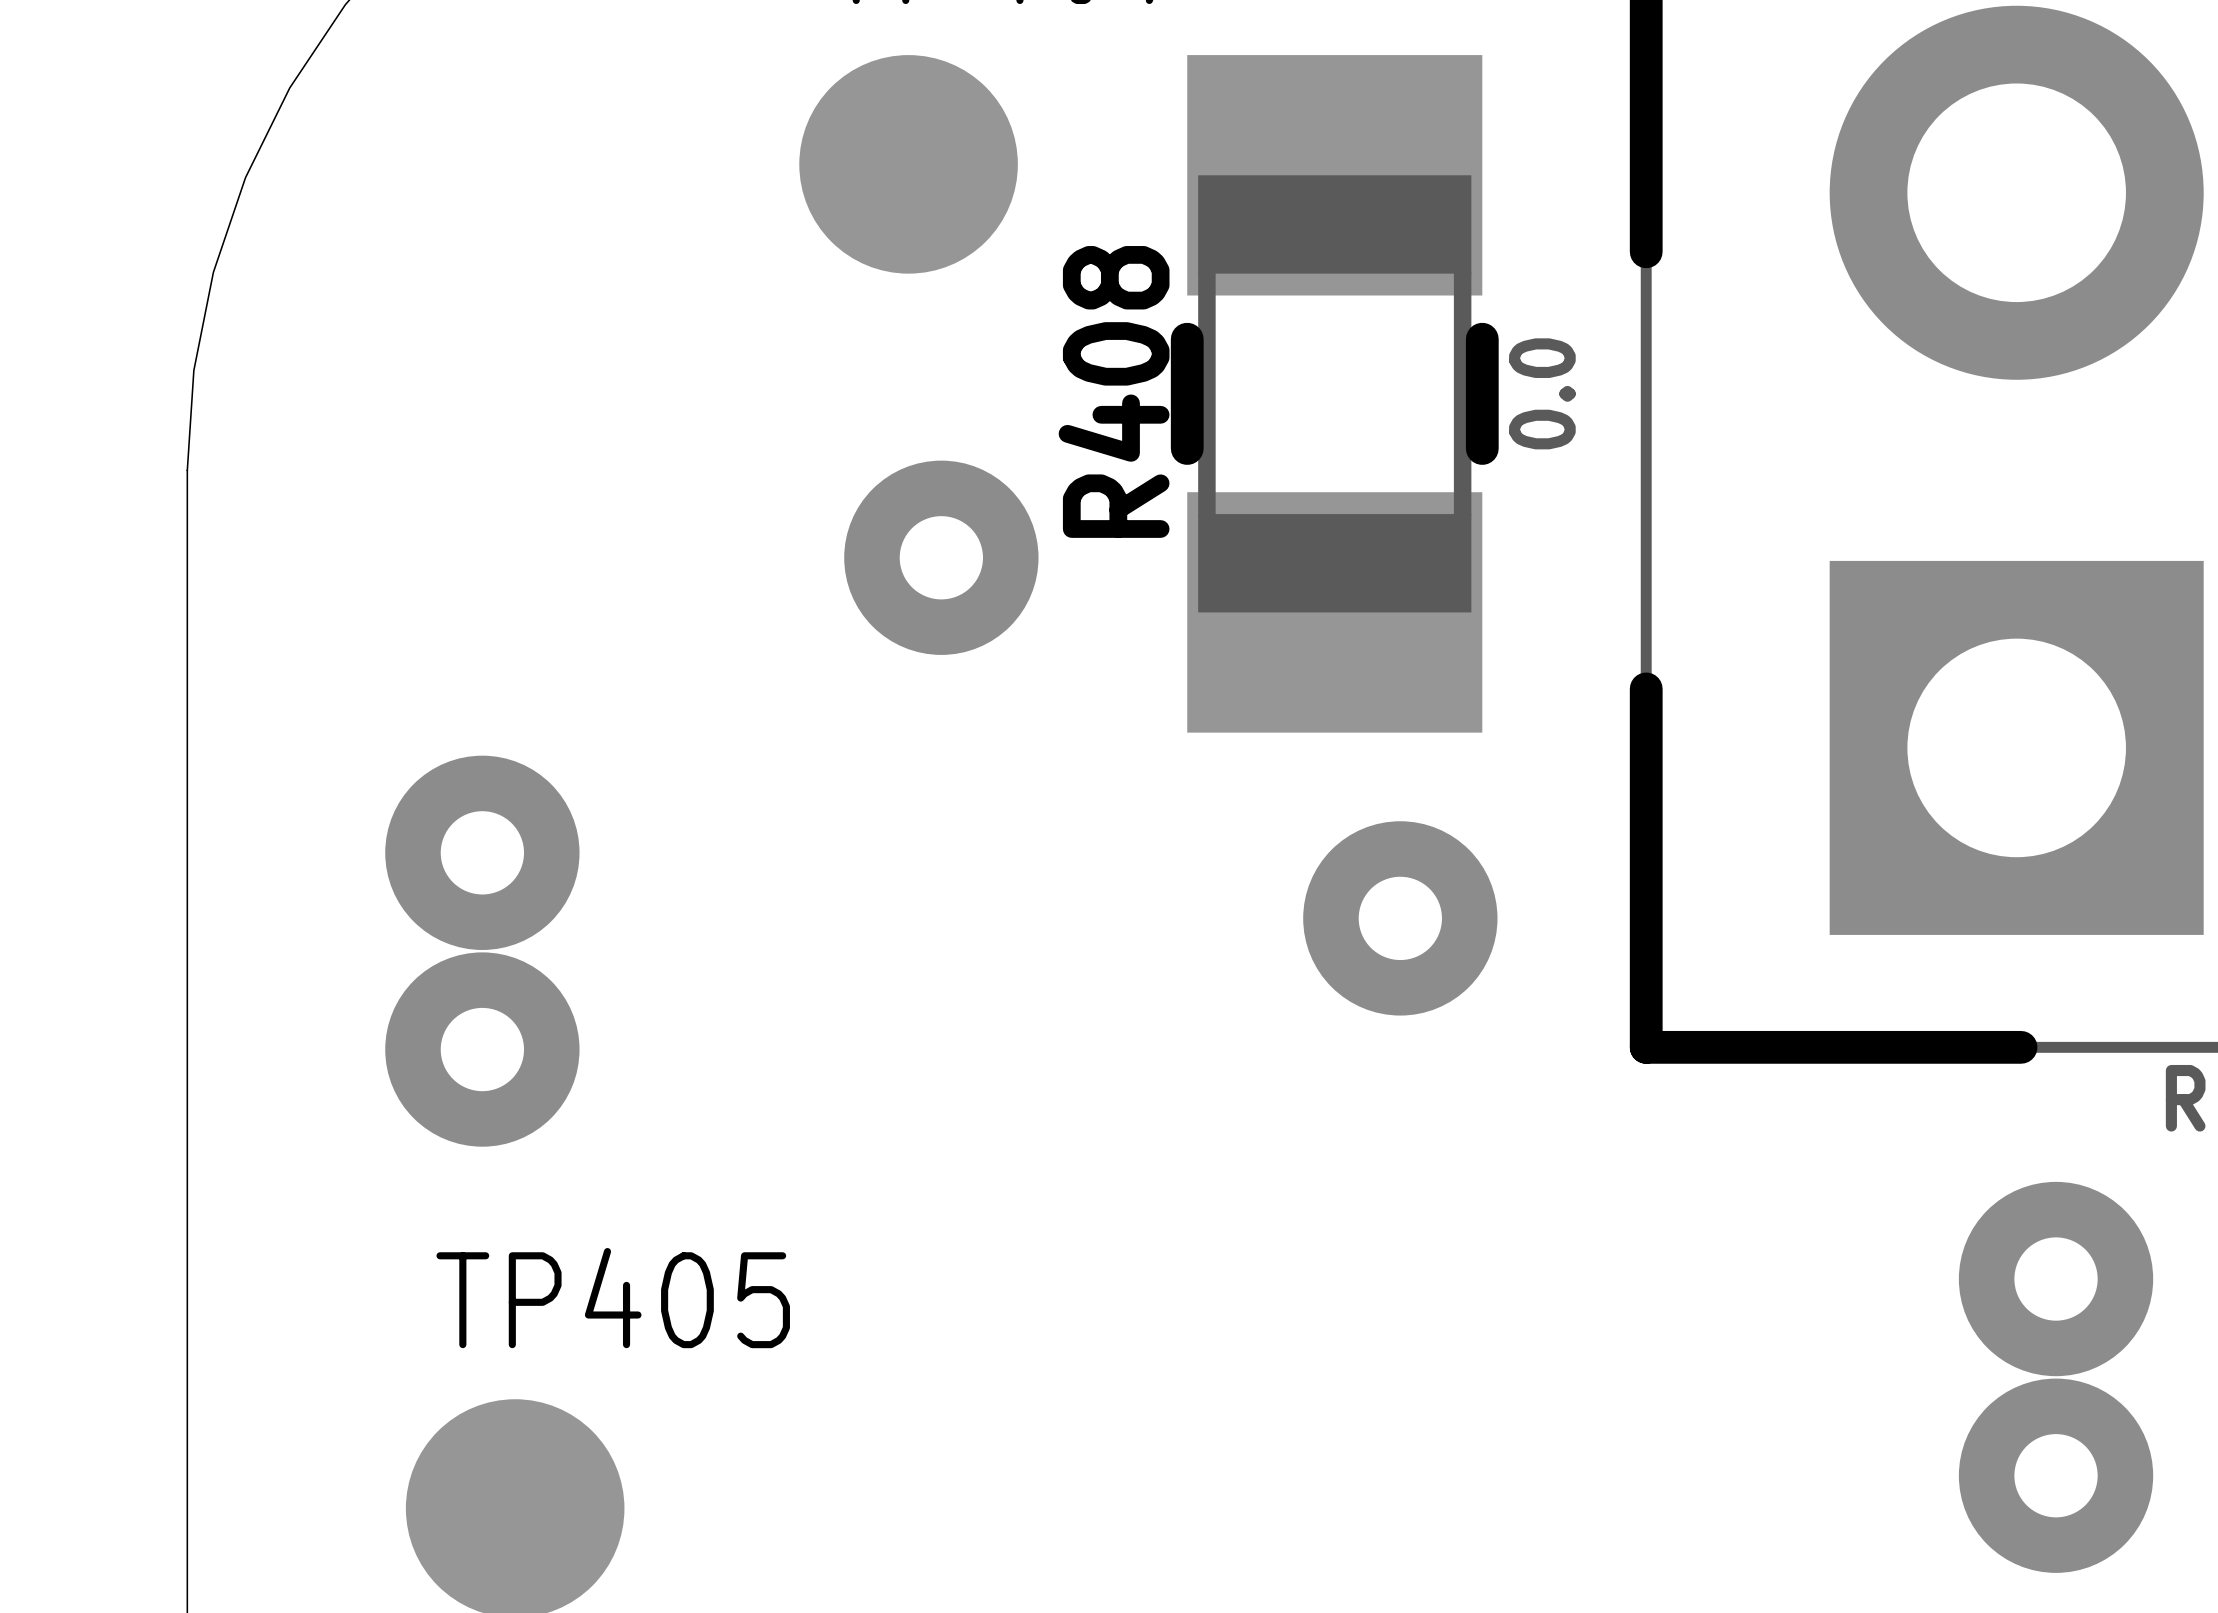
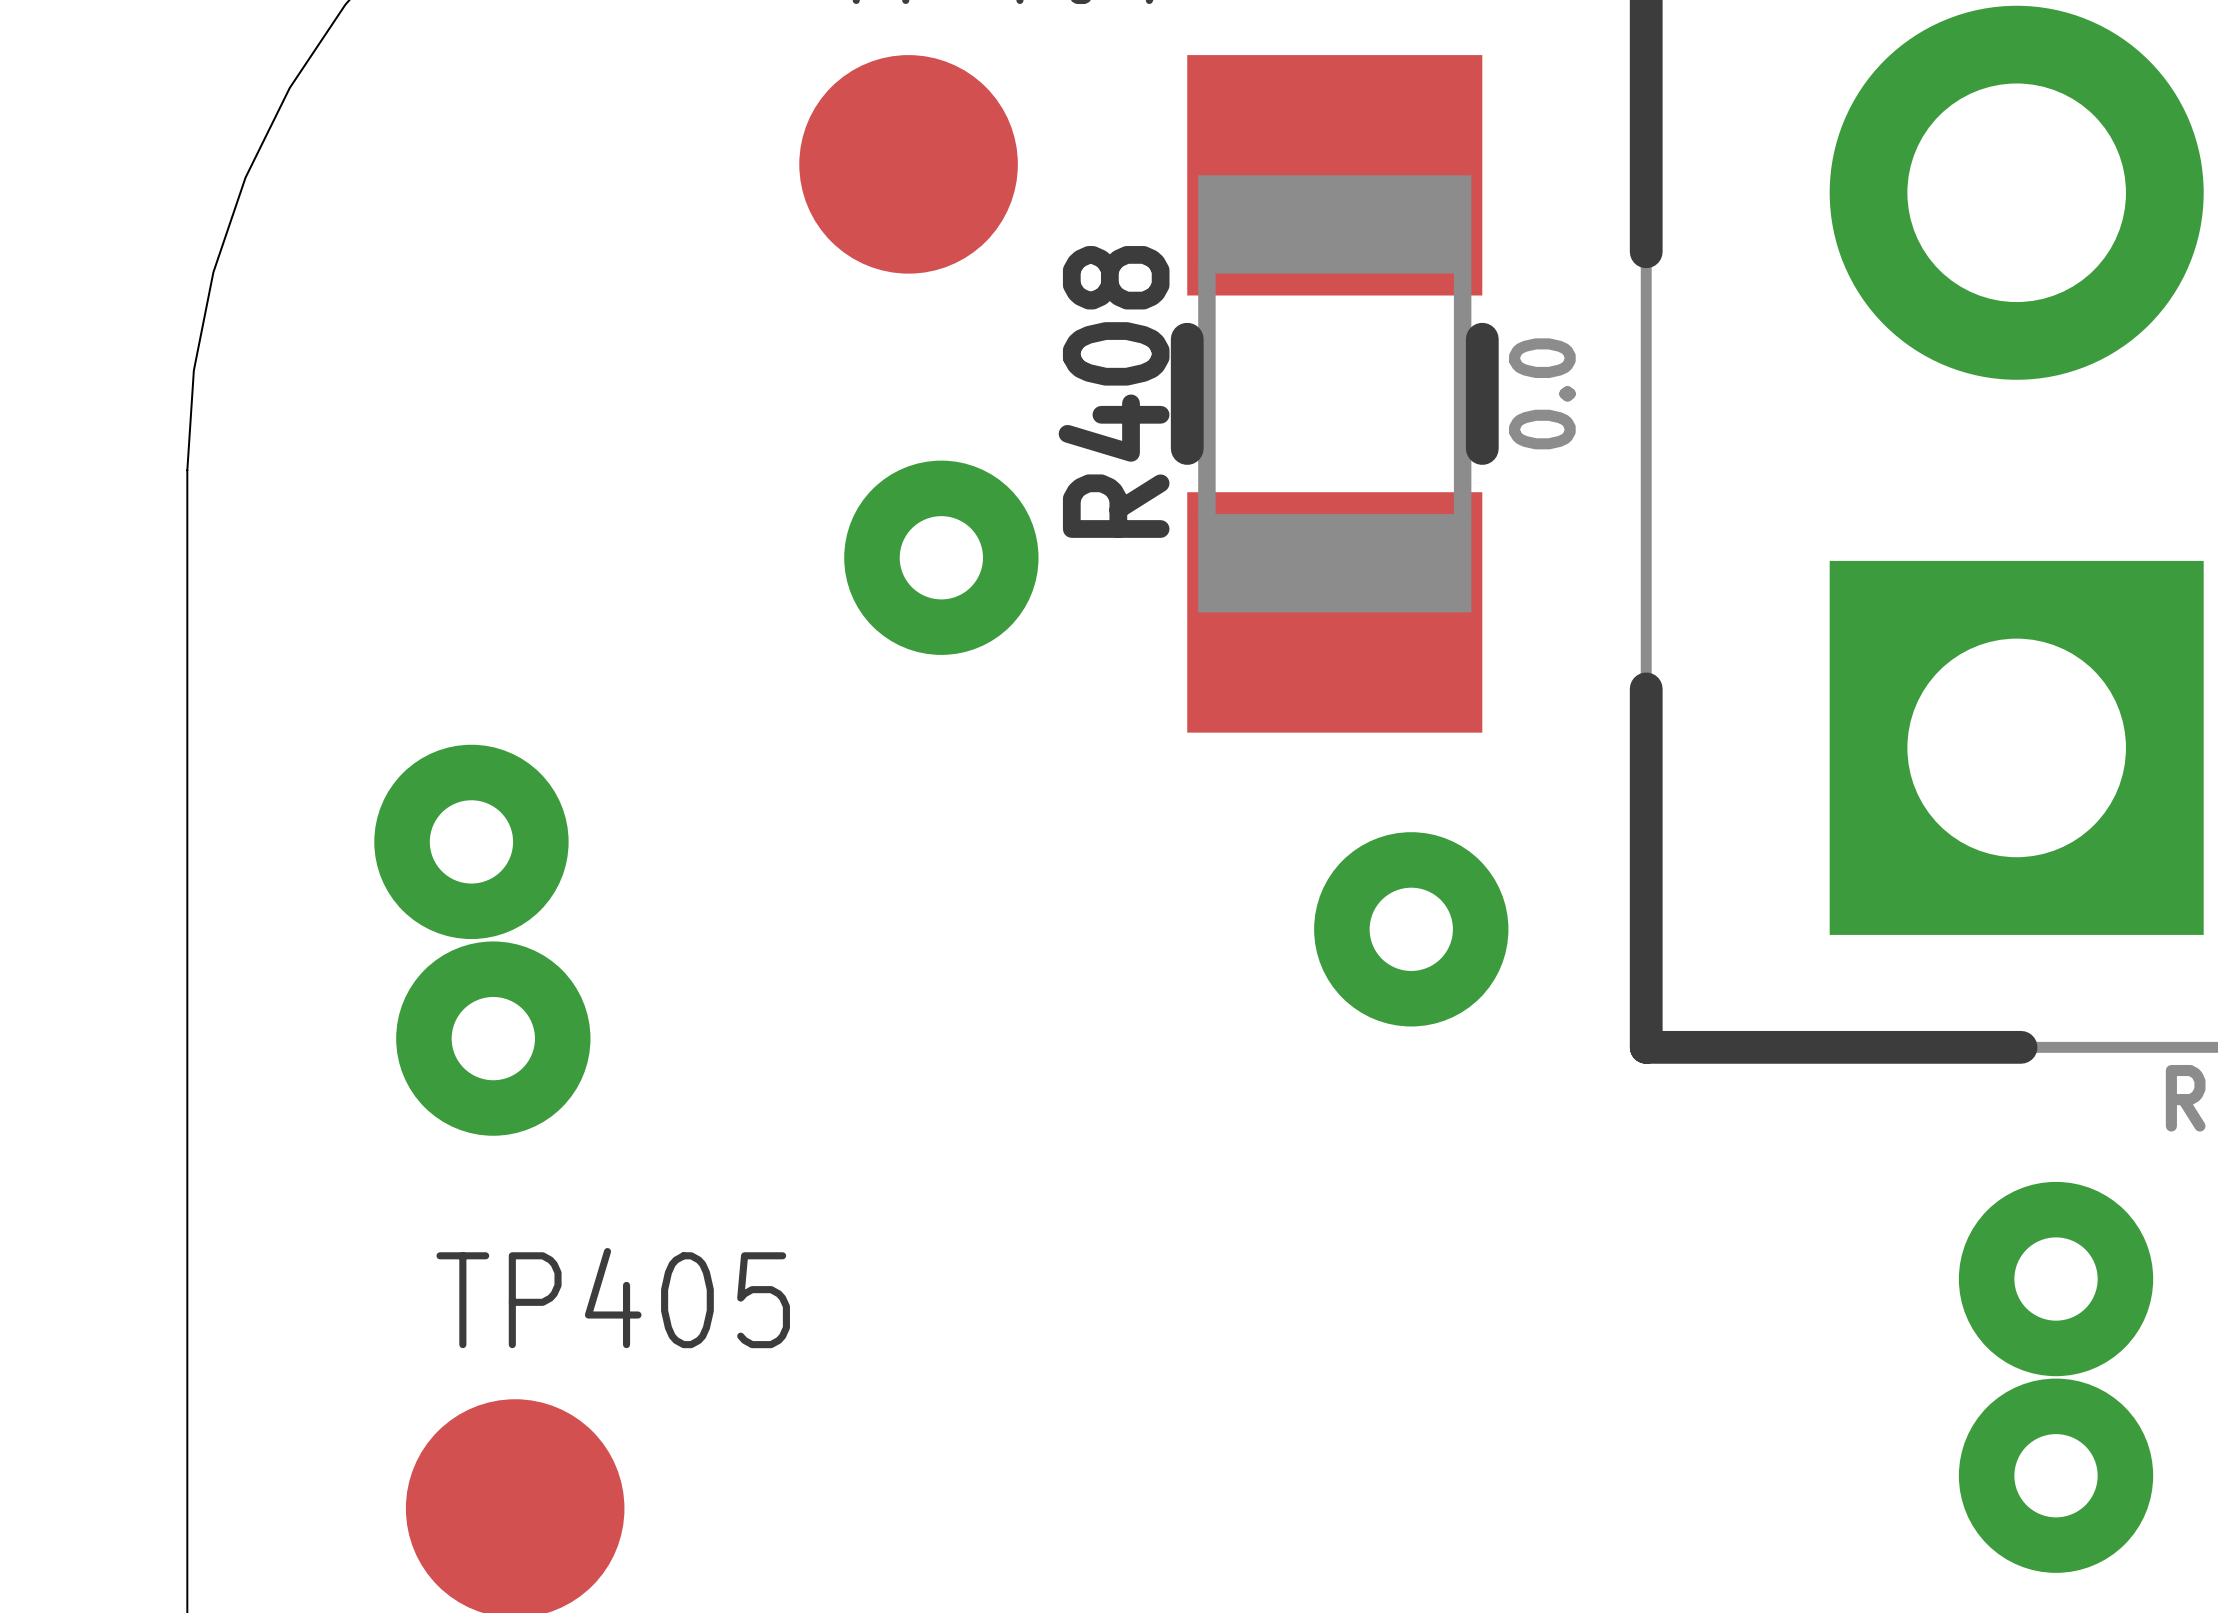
via position: (482, 852) -> (471, 841)
via position: (1400, 918) -> (1411, 929)
via position: (482, 1049) -> (493, 1038)

